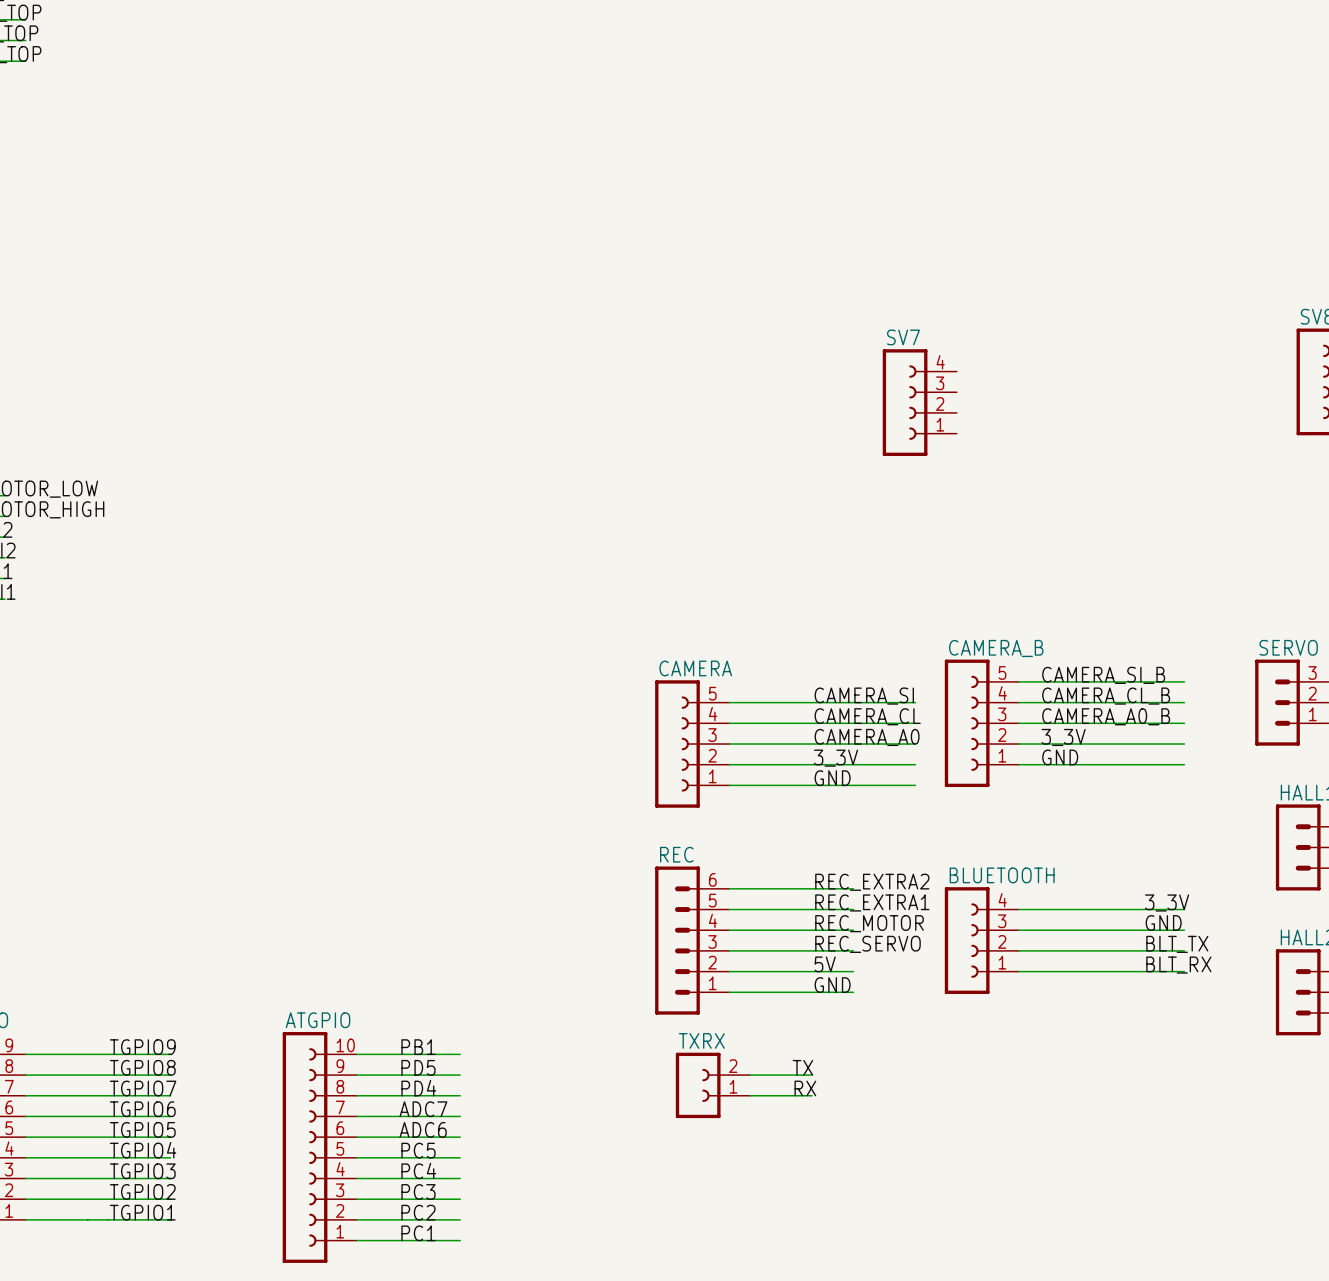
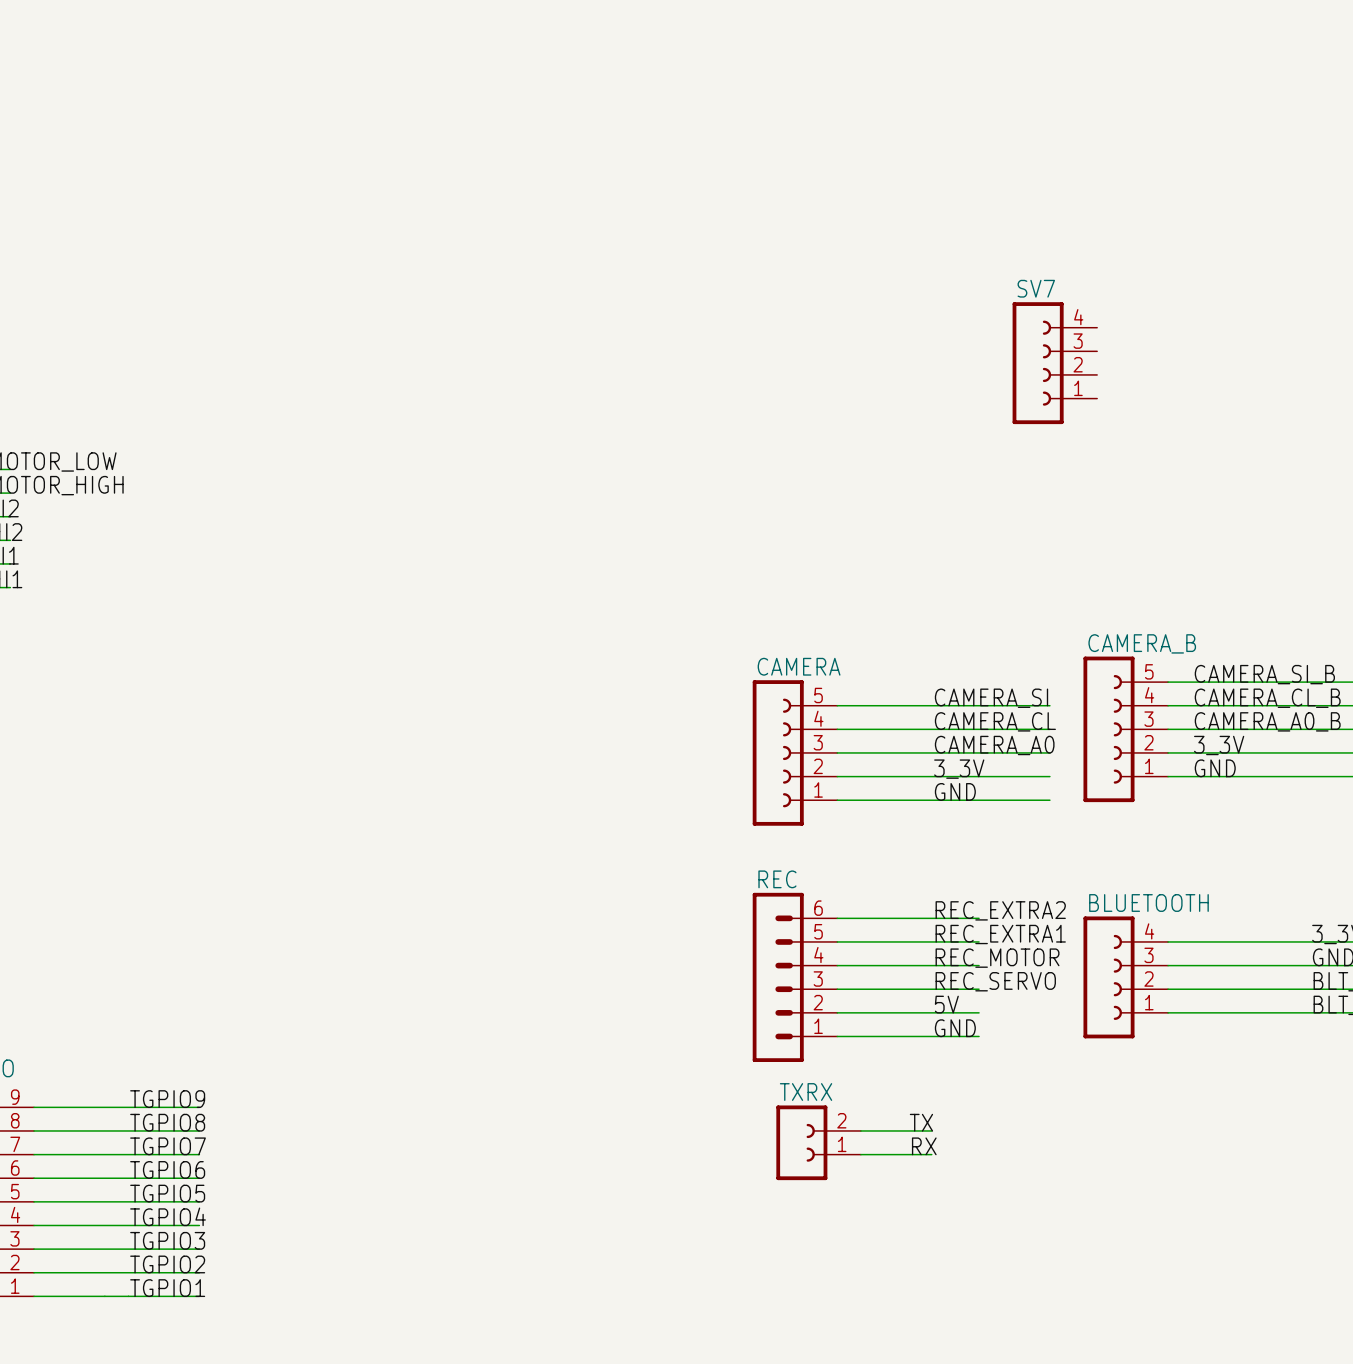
label: PB1 (418, 1047) -> none
wire: (356, 1054) (460, 1054) -> none
label: PD5 (418, 1067) -> none
wire: (356, 1075) (460, 1075) -> none
label: PD4 (418, 1088) -> none
wire: (356, 1095) (460, 1095) -> none
label: ADC7 (423, 1109) -> none
wire: (356, 1116) (460, 1116) -> none
label: ADC6 (423, 1129) -> none
wire: (356, 1137) (460, 1137) -> none
ATGPIO: (319, 1147) -> none
label: PC5 (418, 1150) -> none
wire: (356, 1157) (460, 1157) -> none
label: PC4 (418, 1170) -> none
wire: (356, 1178) (460, 1178) -> none
label: PC3 (418, 1191) -> none
wire: (356, 1199) (460, 1199) -> none
label: PC2 (418, 1212) -> none
wire: (356, 1219) (460, 1219) -> none
label: PC1 (418, 1233) -> none
wire: (356, 1240) (460, 1240) -> none

